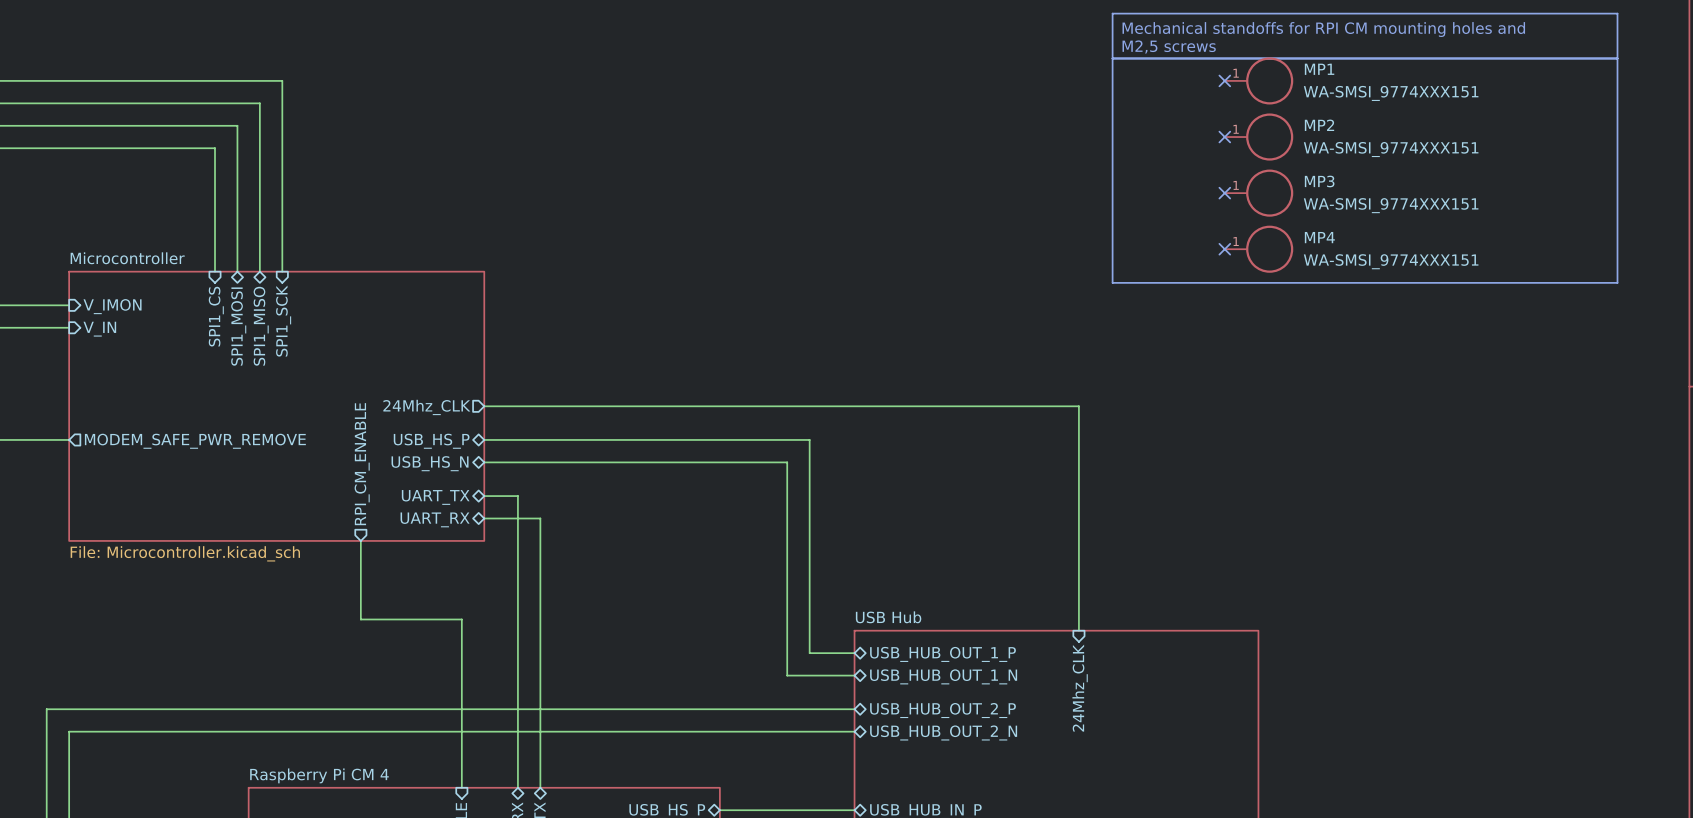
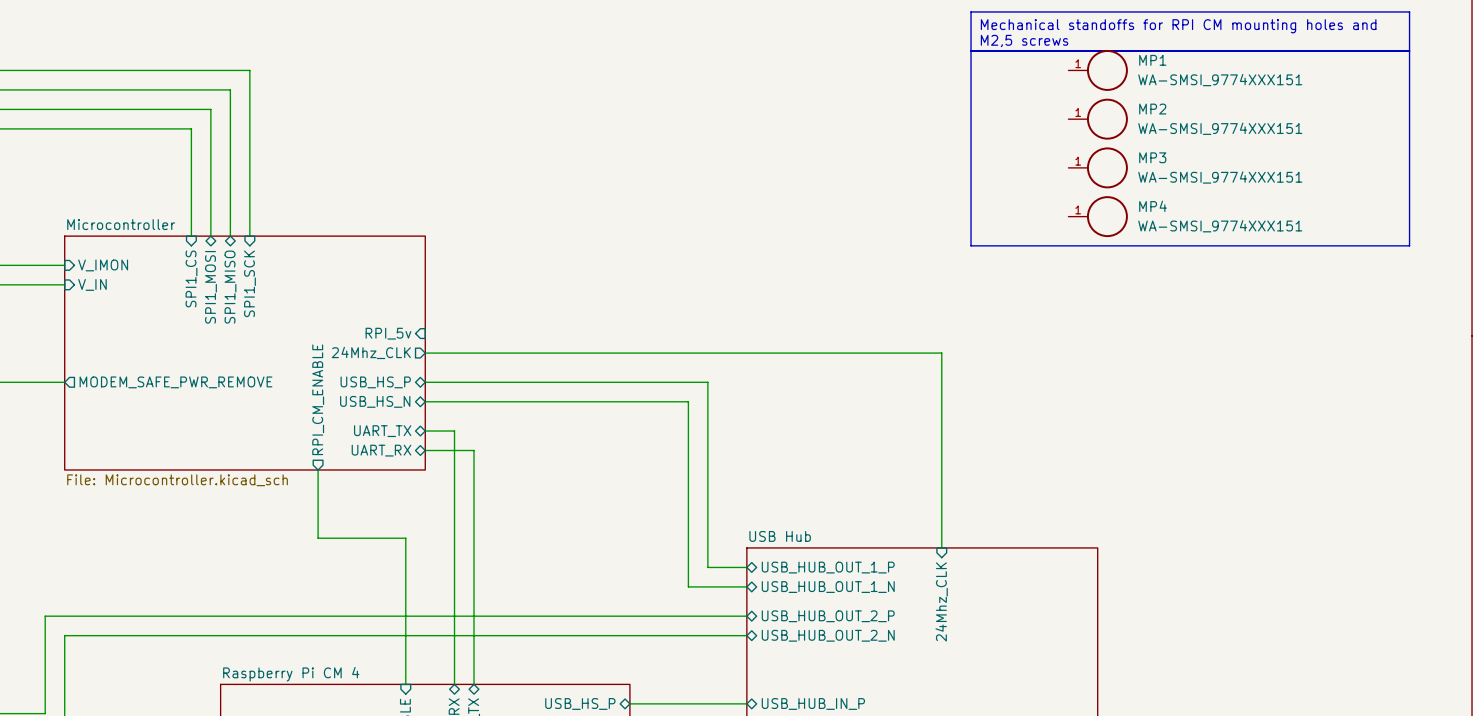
no-connect mark: (1224, 80) -> none
no-connect mark: (1224, 137) -> none
no-connect mark: (1224, 193) -> none
no-connect mark: (1224, 249) -> none
sheet pin: none -> RPI_5v (388, 333)

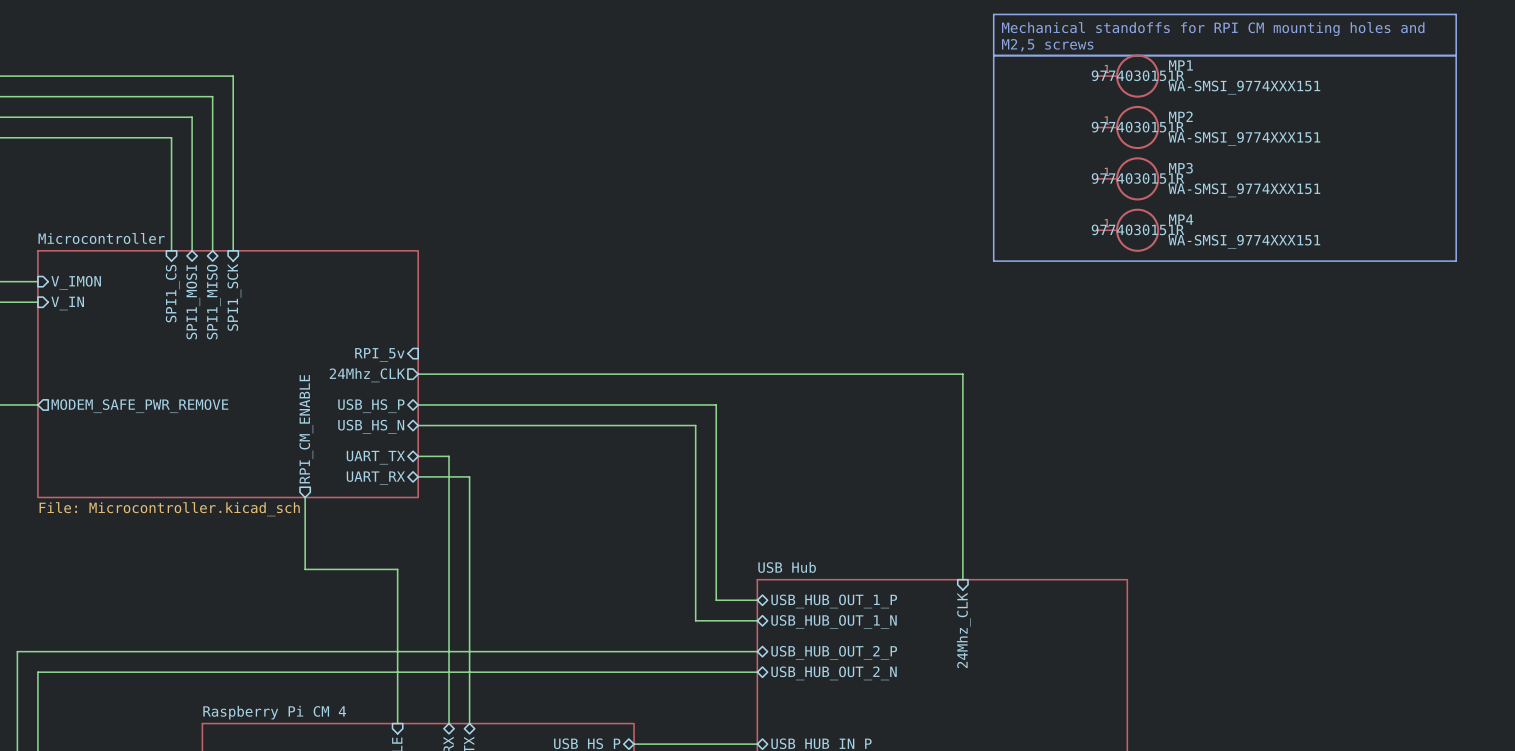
MP1 text: none -> 9774030151R (1138, 75)
MP2 text: none -> 9774030151R (1138, 127)
MP3 text: none -> 9774030151R (1138, 178)
MP4 text: none -> 9774030151R (1138, 229)

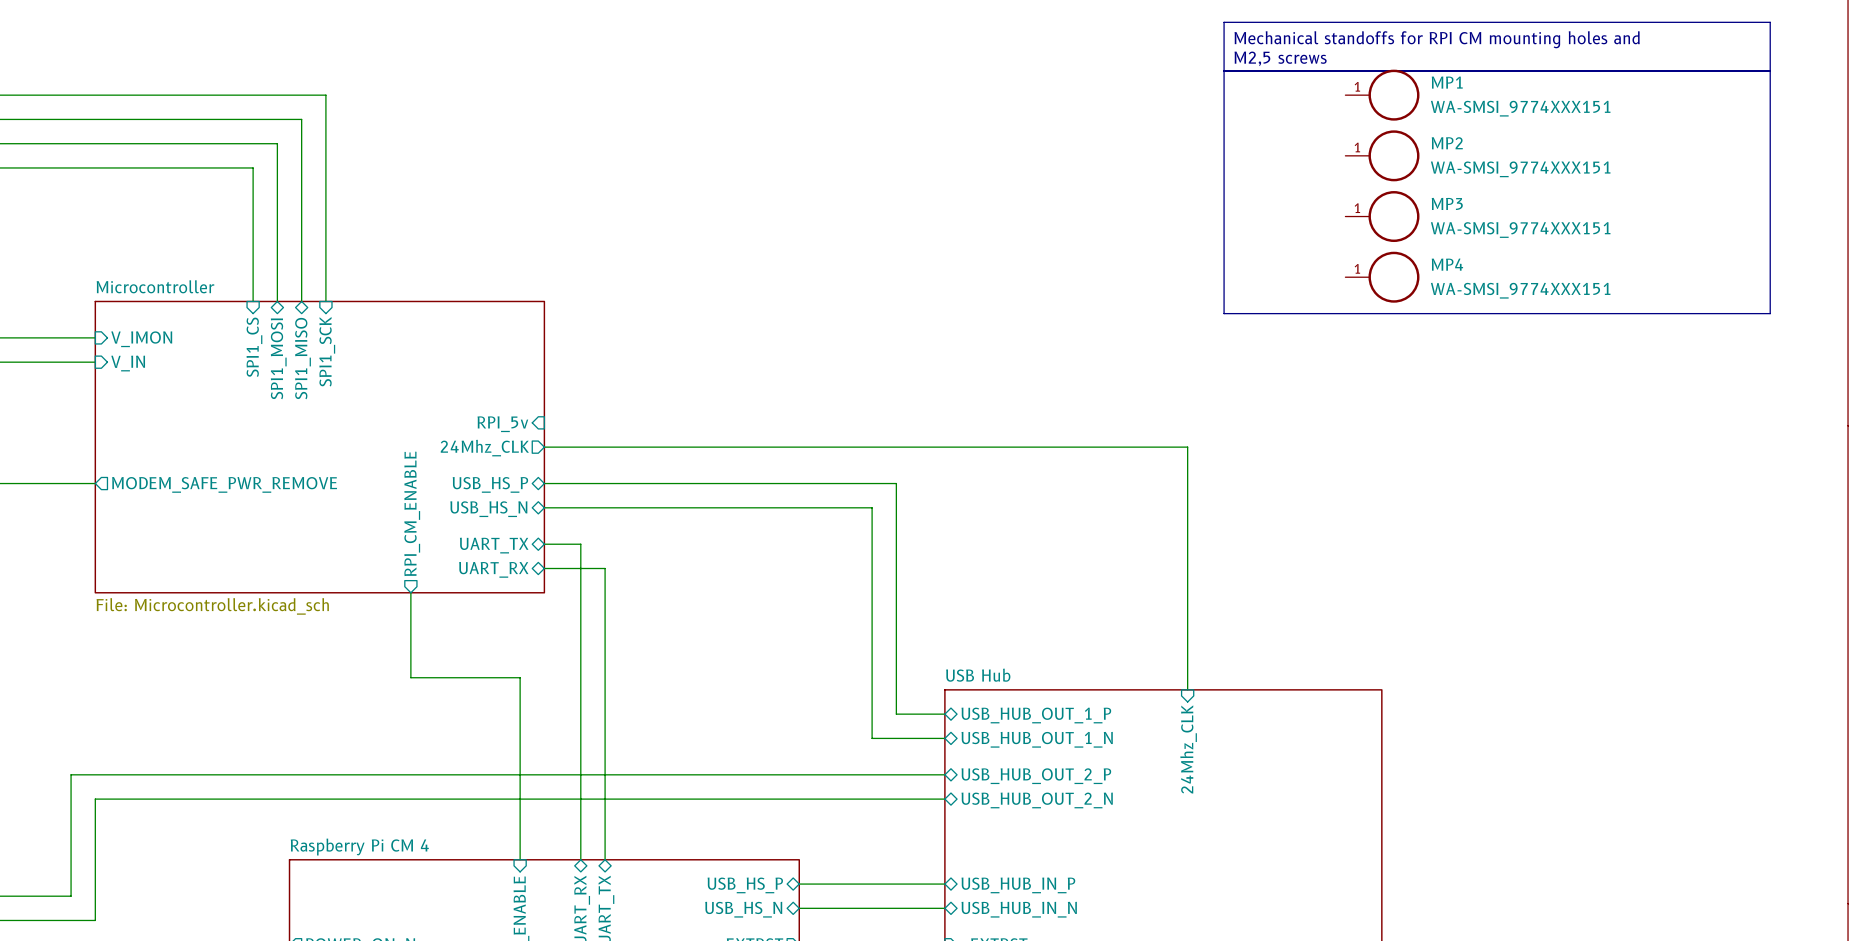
MP1 text: 9774030151R (1138, 75) -> none
MP2 text: 9774030151R (1138, 127) -> none
MP3 text: 9774030151R (1138, 178) -> none
MP4 text: 9774030151R (1138, 229) -> none

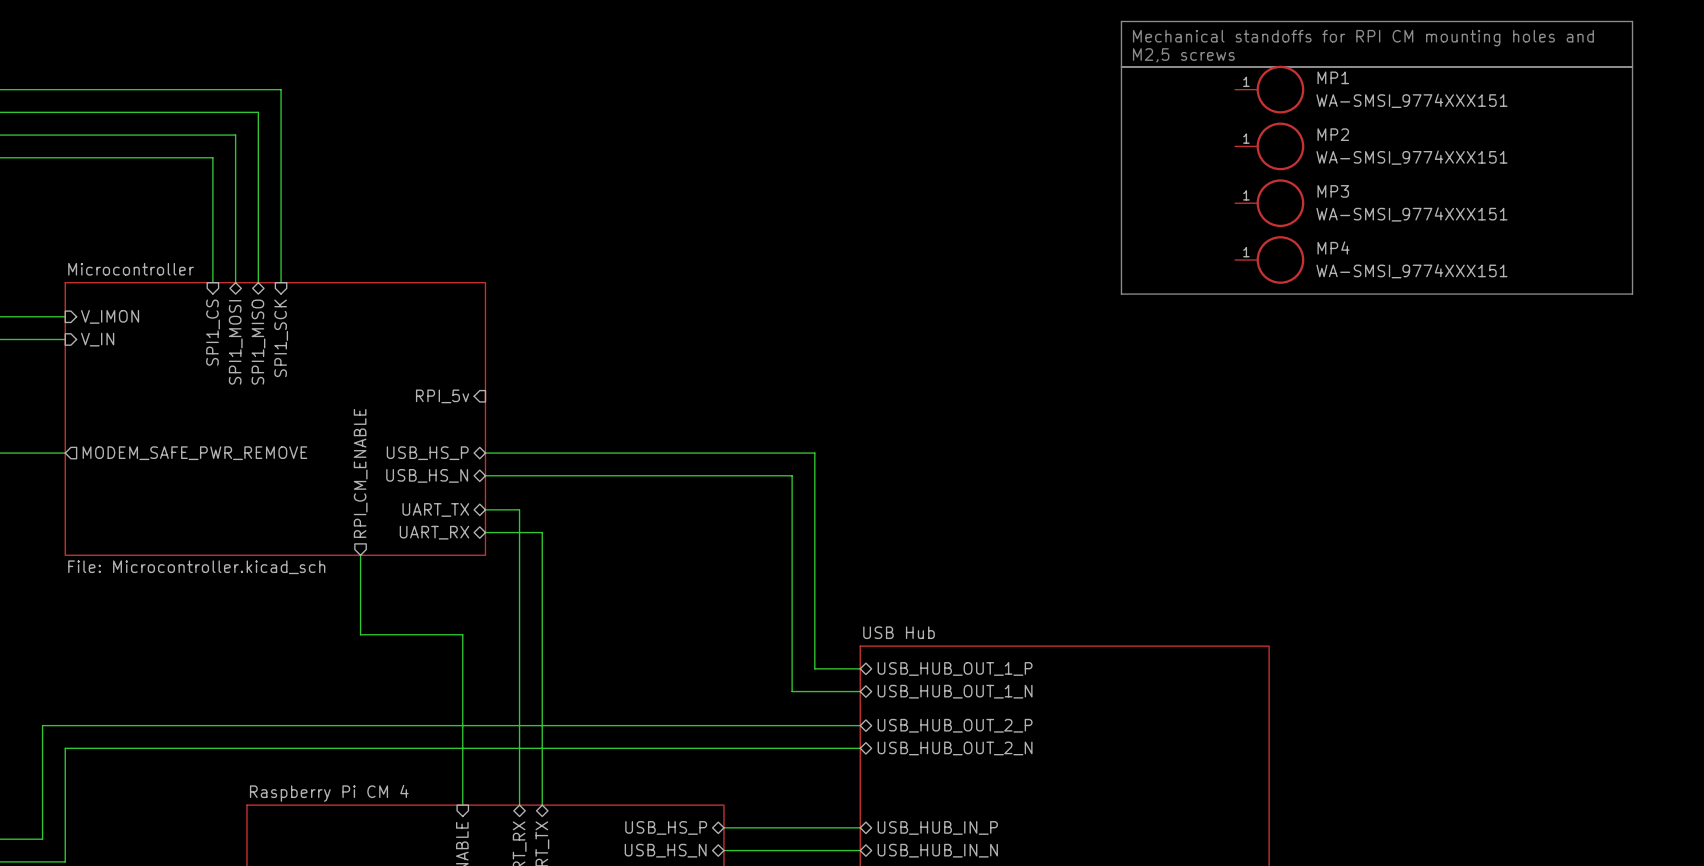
wire: (544, 447) (1187, 447) (1187, 689) -> none
sheet pin: 24Mhz_CLK (484, 448) -> none
sheet pin: 24Mhz_CLK (1188, 749) -> none

